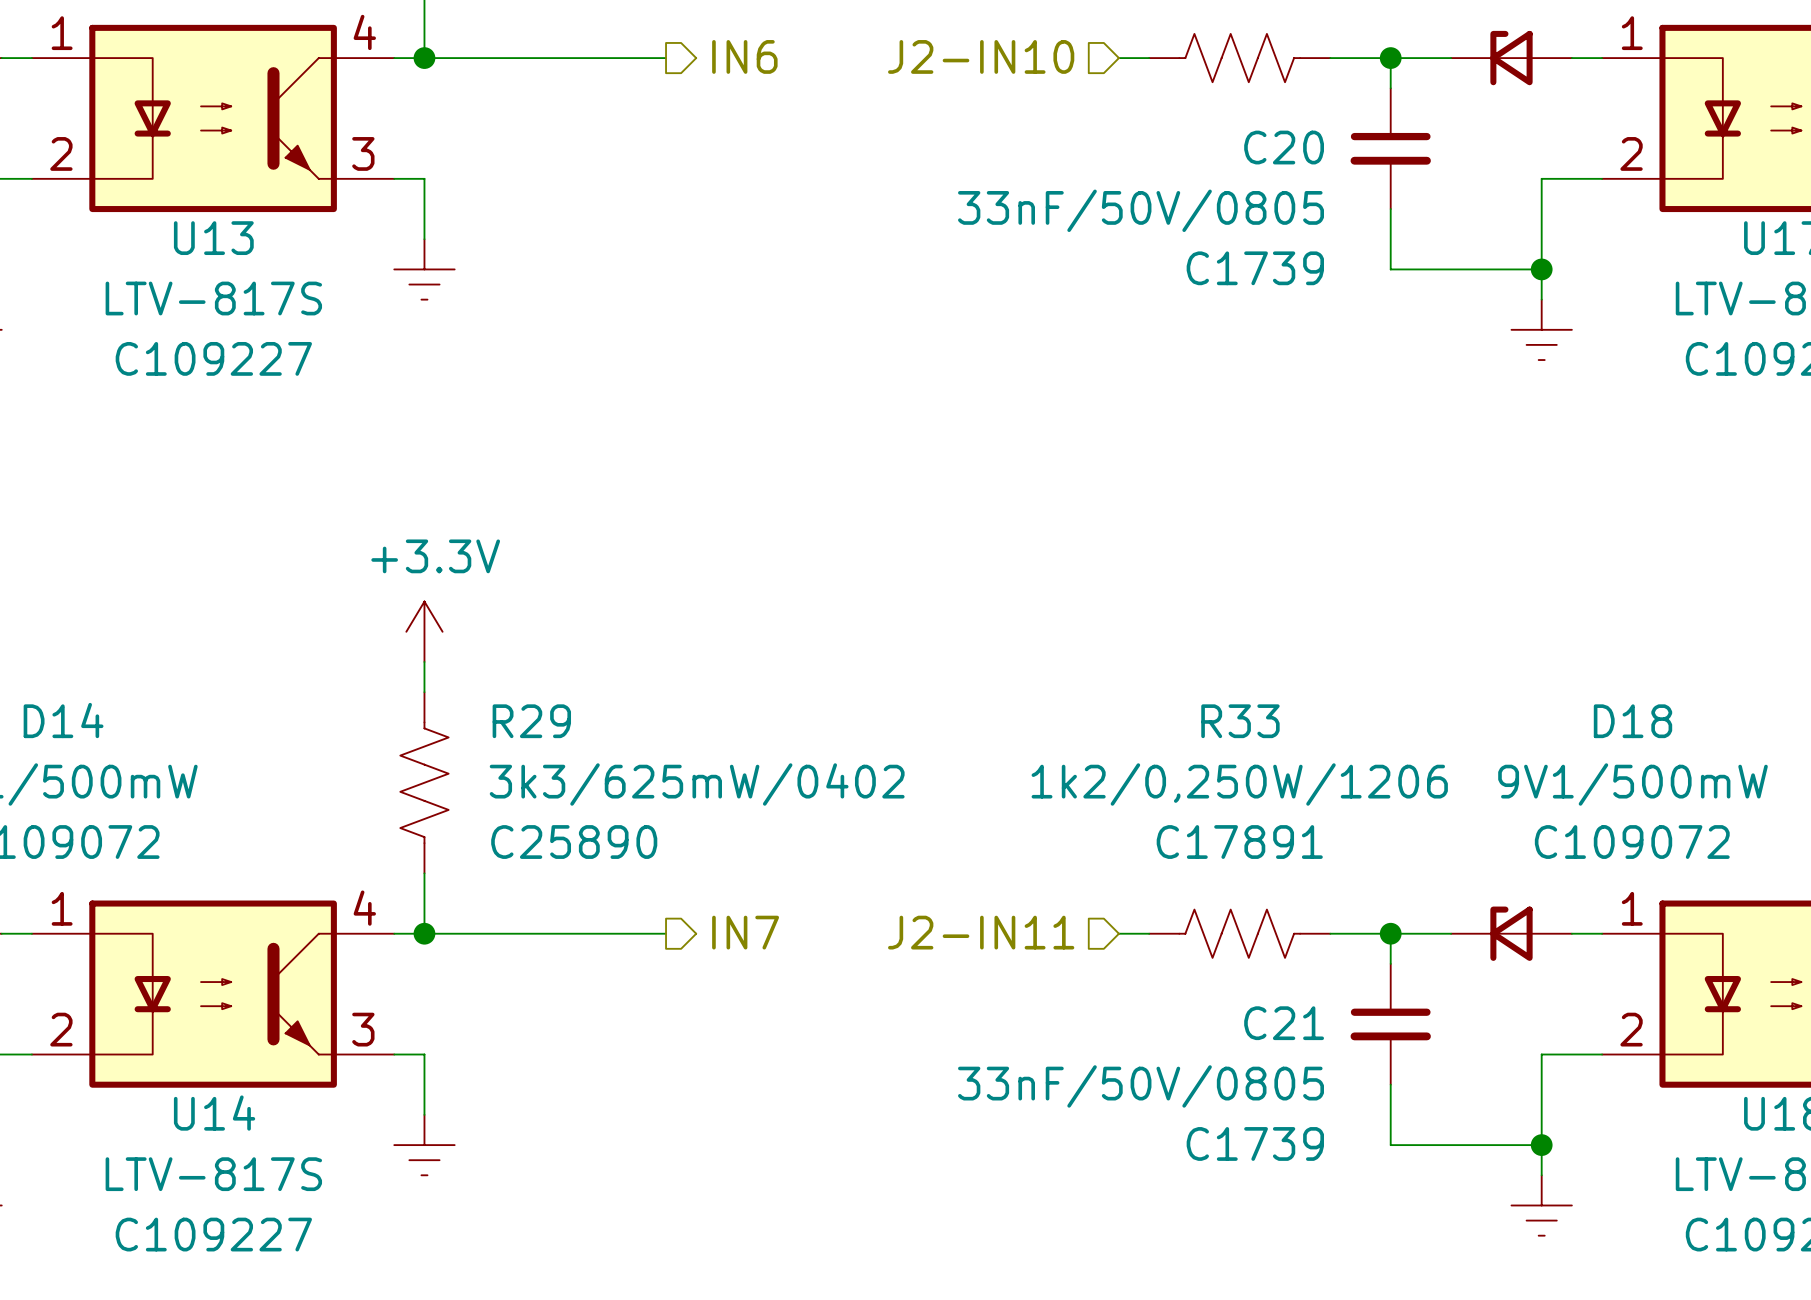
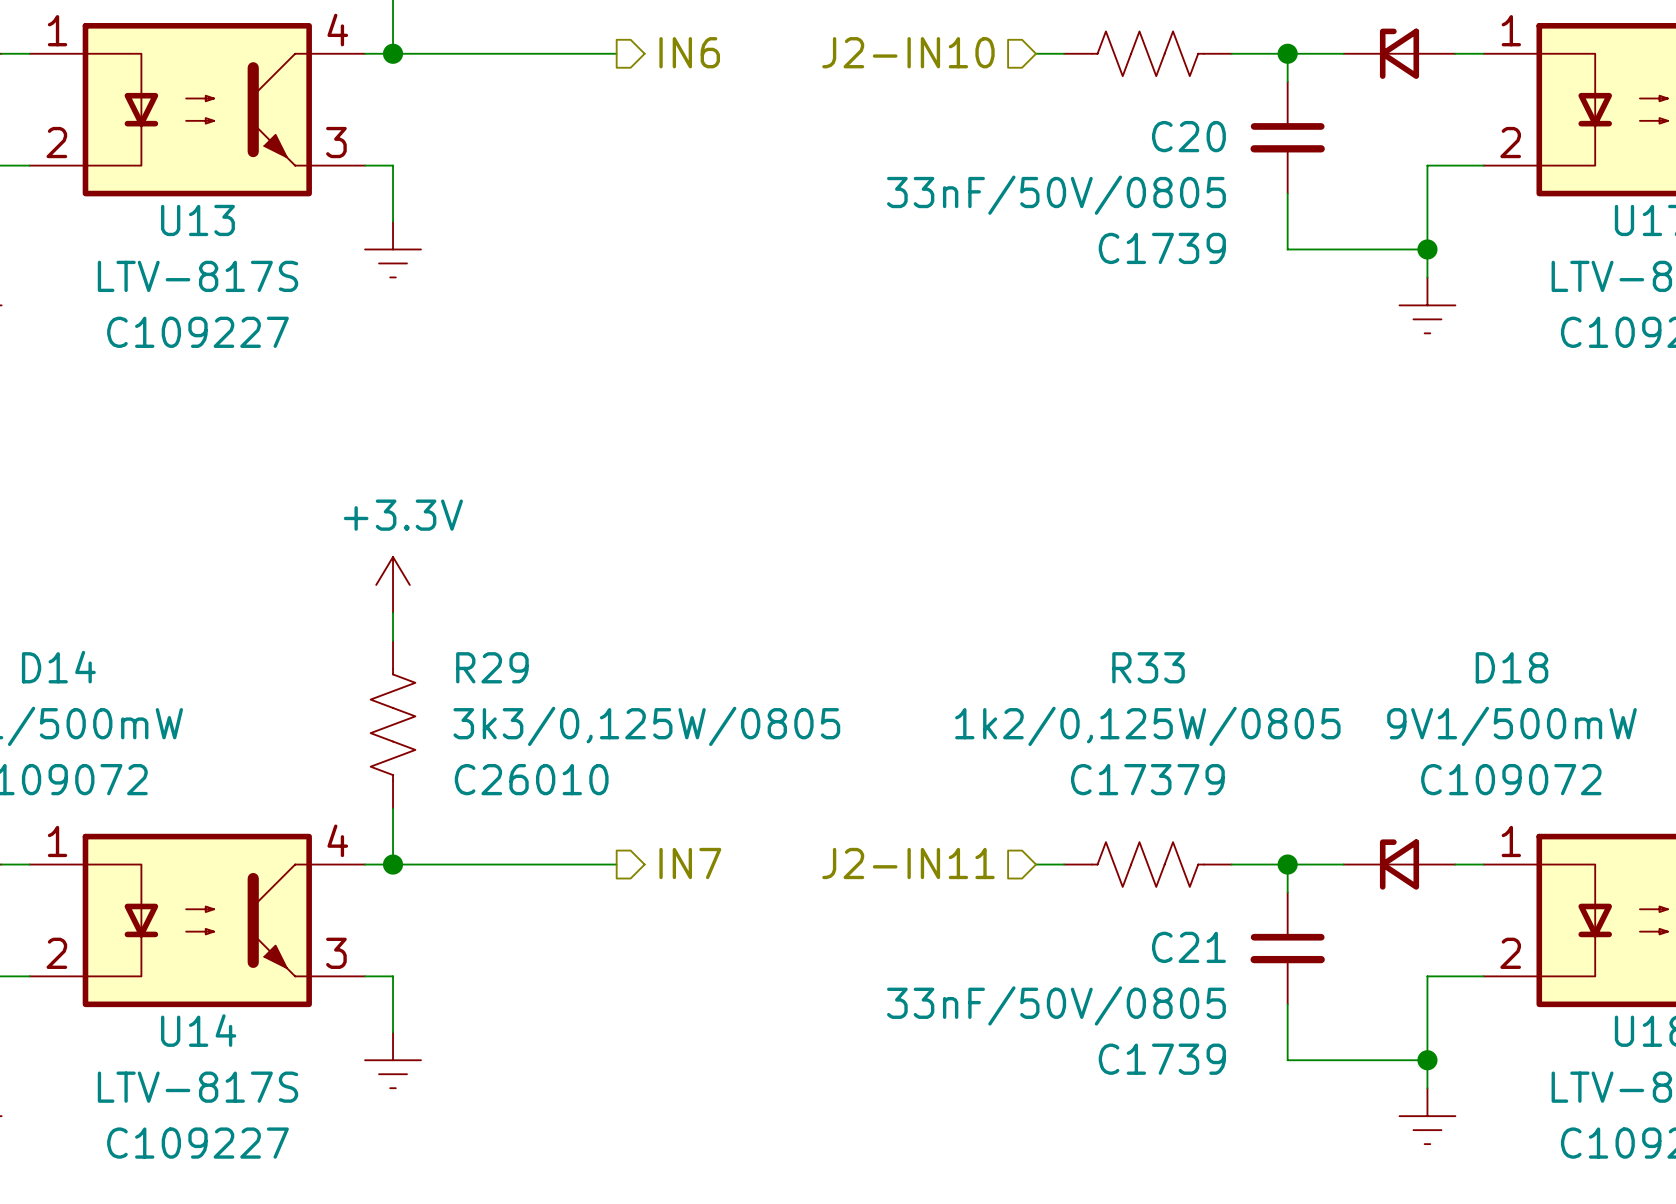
R29 value: 3k3/625mW/0402 (697, 784) -> 3k3/0,125W/0805 (646, 726)
R33 value: 1k2/0,250W/1206 (1239, 784) -> 1k2/0,125W/0805 (1147, 726)
R29 text: C25890 (574, 842) -> C26010 (531, 779)
R33 text: C17891 (1239, 842) -> C17379 (1147, 779)

